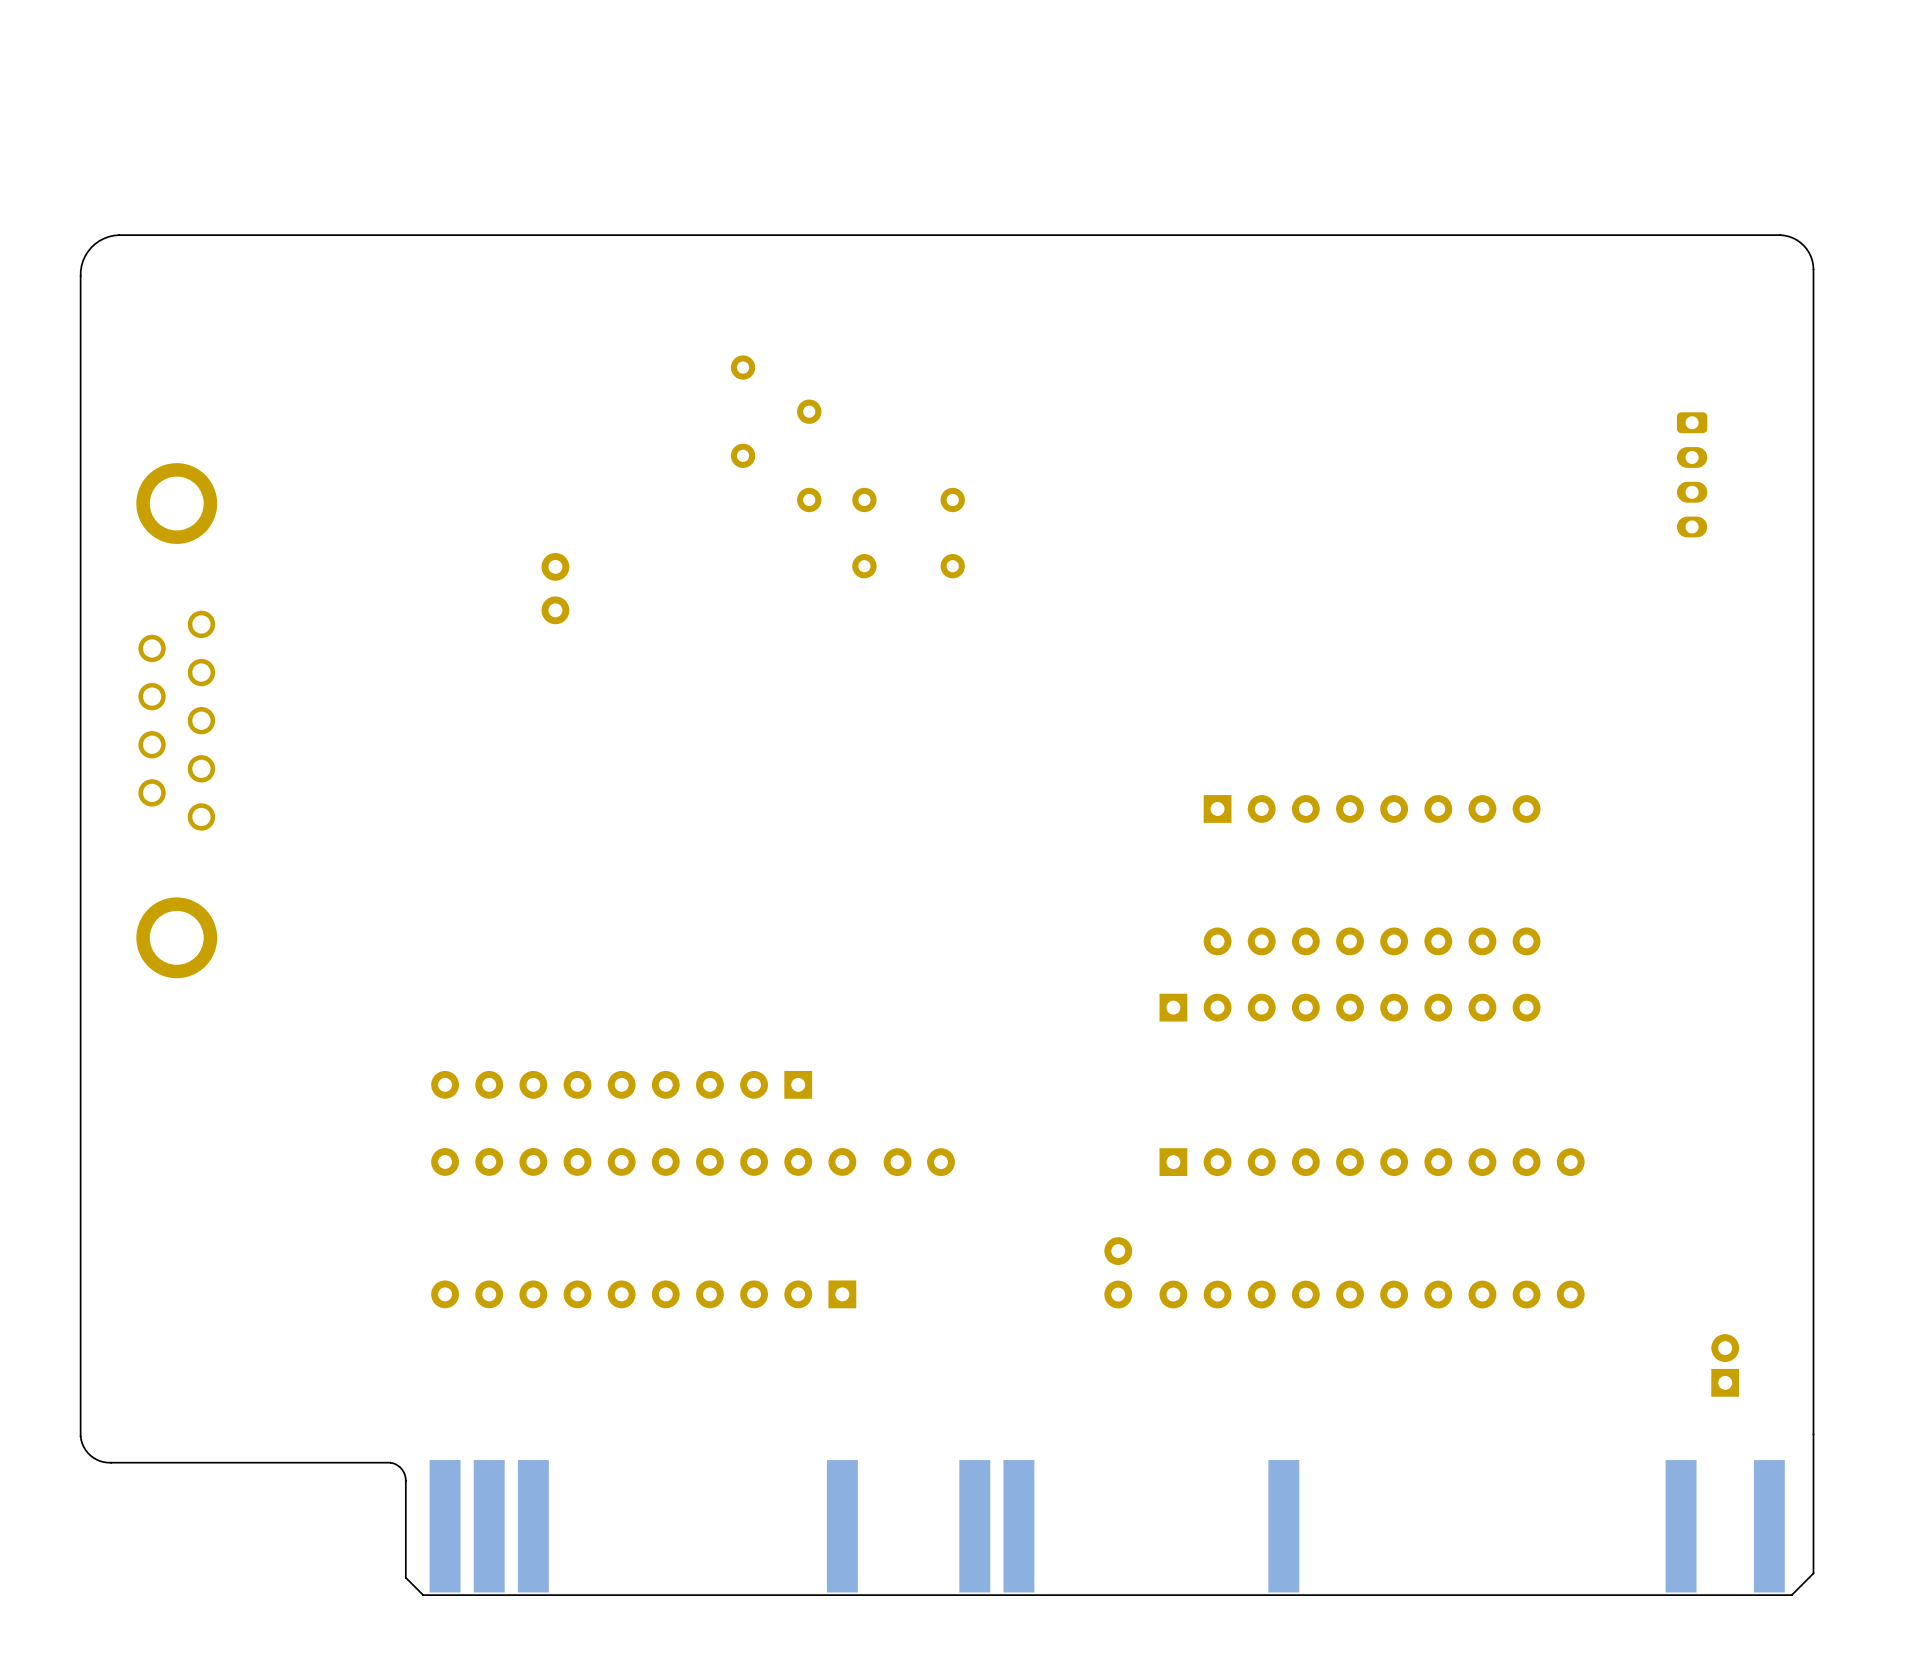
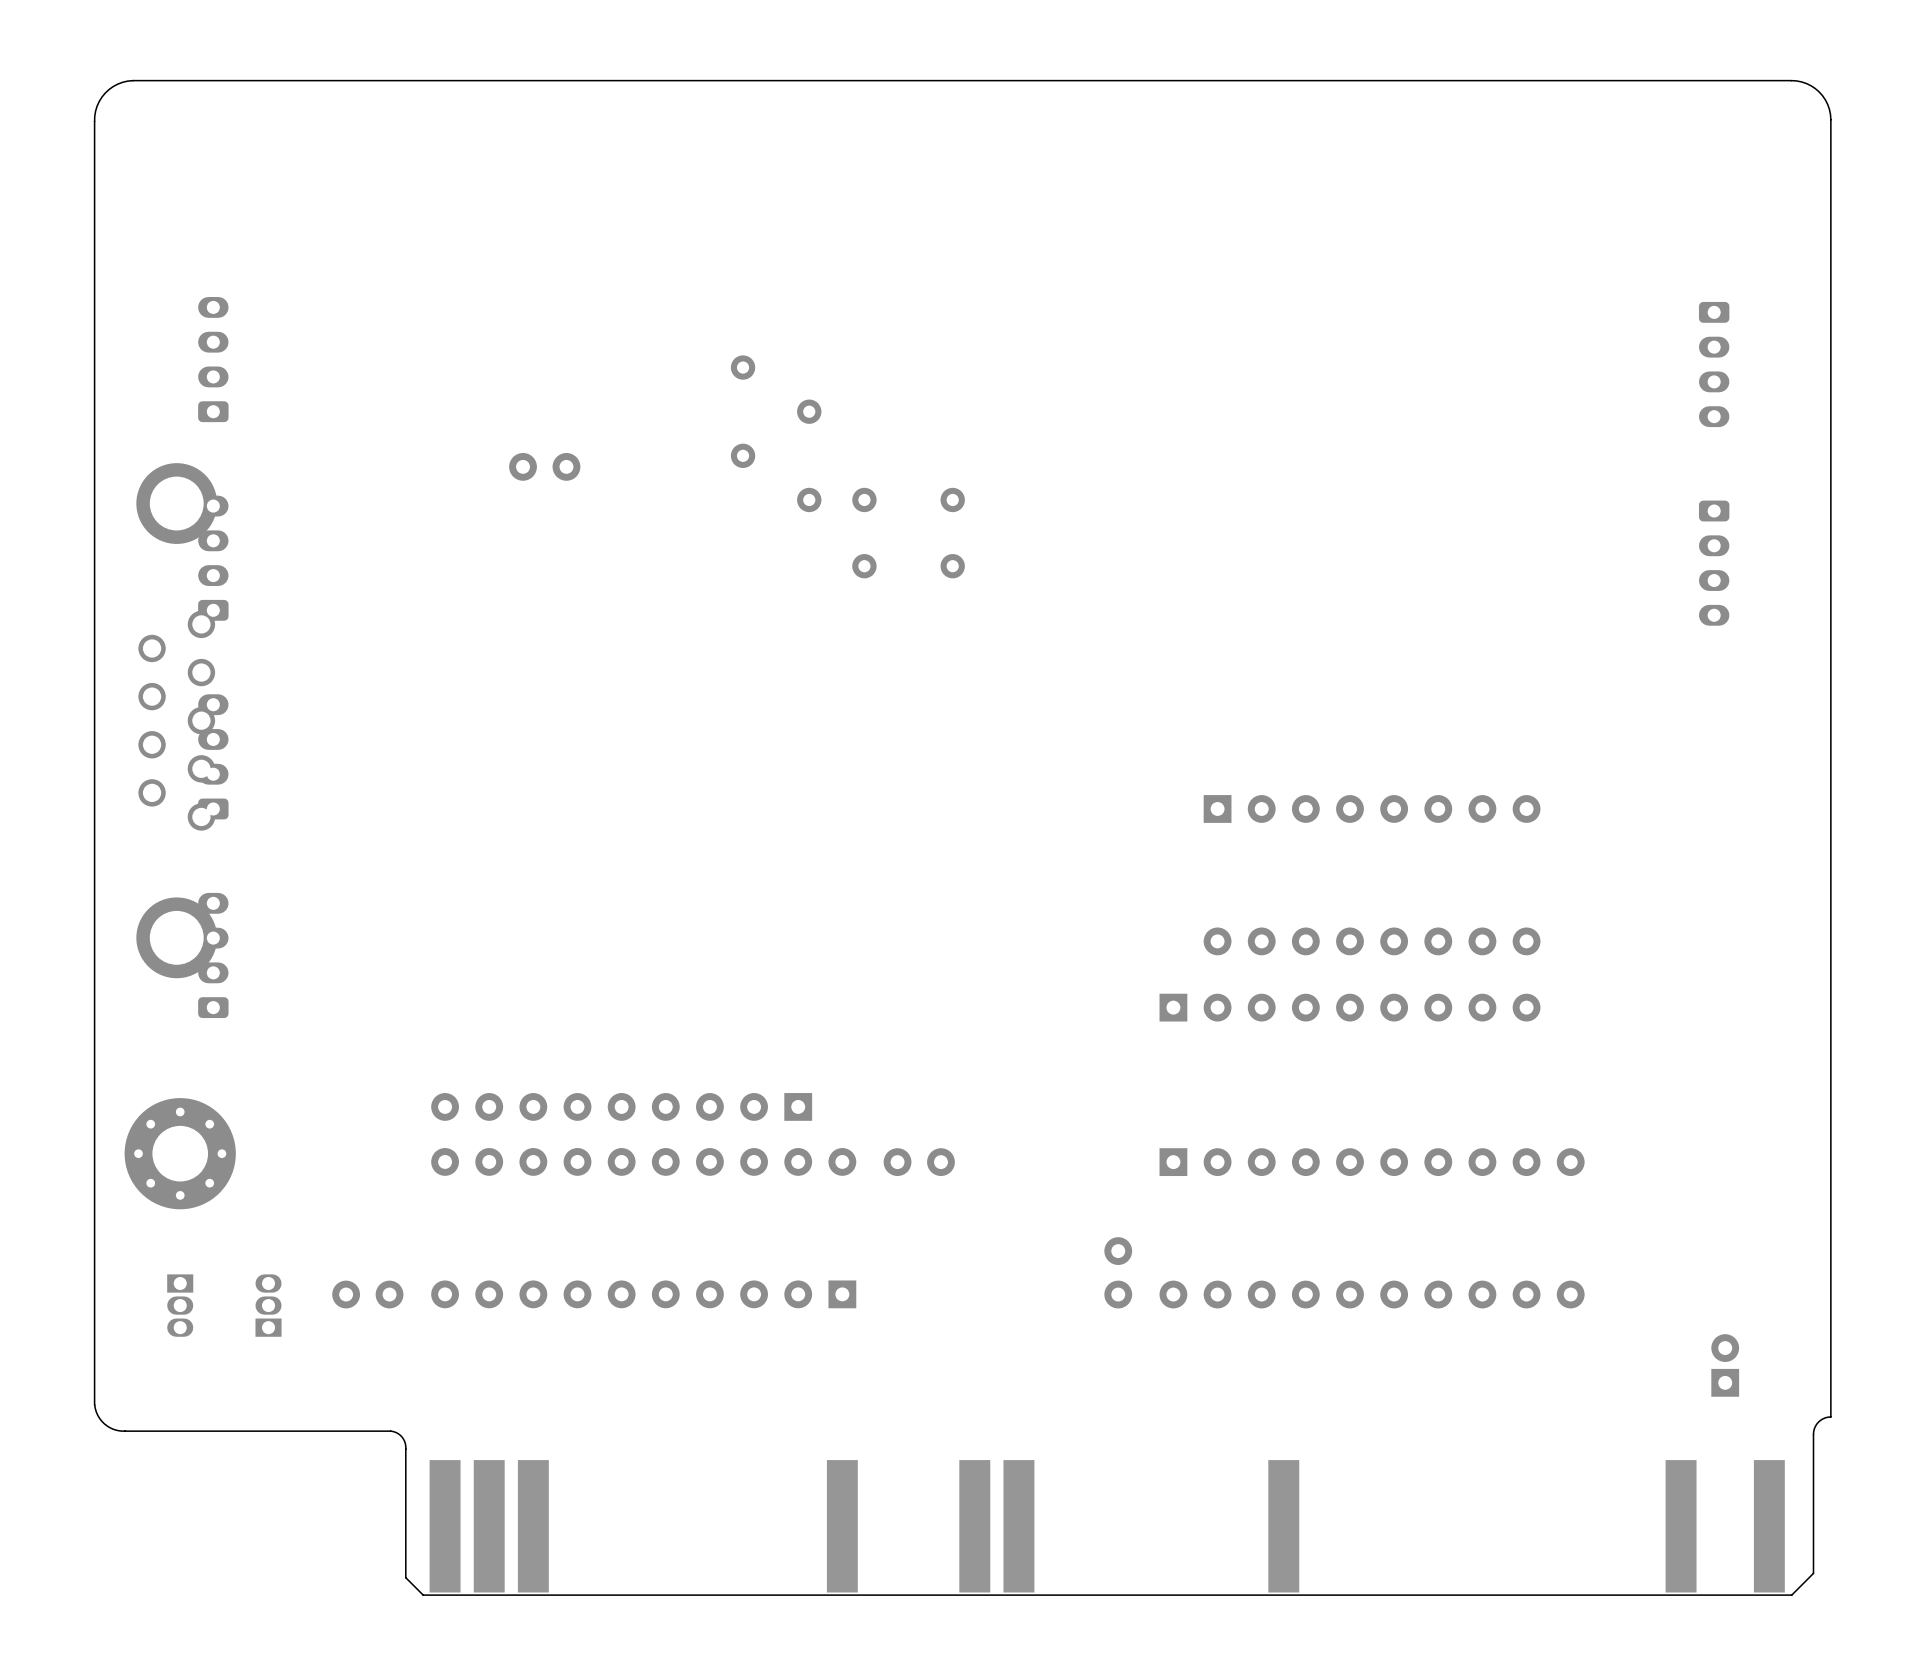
part: none -> (213, 359)
part: none -> (1714, 364)
part: (1692, 474) -> none
part: none -> (213, 558)
part: none -> (1714, 563)
part rotation: 0° (555, 588) -> 90° clockwise (544, 466)
part position: (555, 588) -> (544, 466)
part: none -> (213, 756)
part: none -> (213, 955)
part position: (621, 1084) -> (621, 1106)
part: none -> (180, 1153)
part: none -> (367, 1294)
part: none -> (180, 1305)
part: none -> (268, 1305)
board edge: none -> (94, 1404) (102, 1421) (110, 1428) (121, 1431) (392, 1431) (400, 1435) (405, 1443) (405, 1480)
board edge: (1813, 1434) (1813, 269) (1809, 252) (1797, 240) (1780, 235) (118, 235) (108, 236) (99, 241) (88, 251) (83, 260) (80, 275) (81, 1440) (90, 1455) (107, 1462) (390, 1462) (401, 1468) (405, 1480) -> (1813, 1434) (1818, 1422) (1830, 1416) (1830, 119) (1827, 104) (1819, 91) (1806, 83) (1791, 80) (132, 80) (117, 84) (109, 89) (99, 101) (94, 121) (94, 1404)

